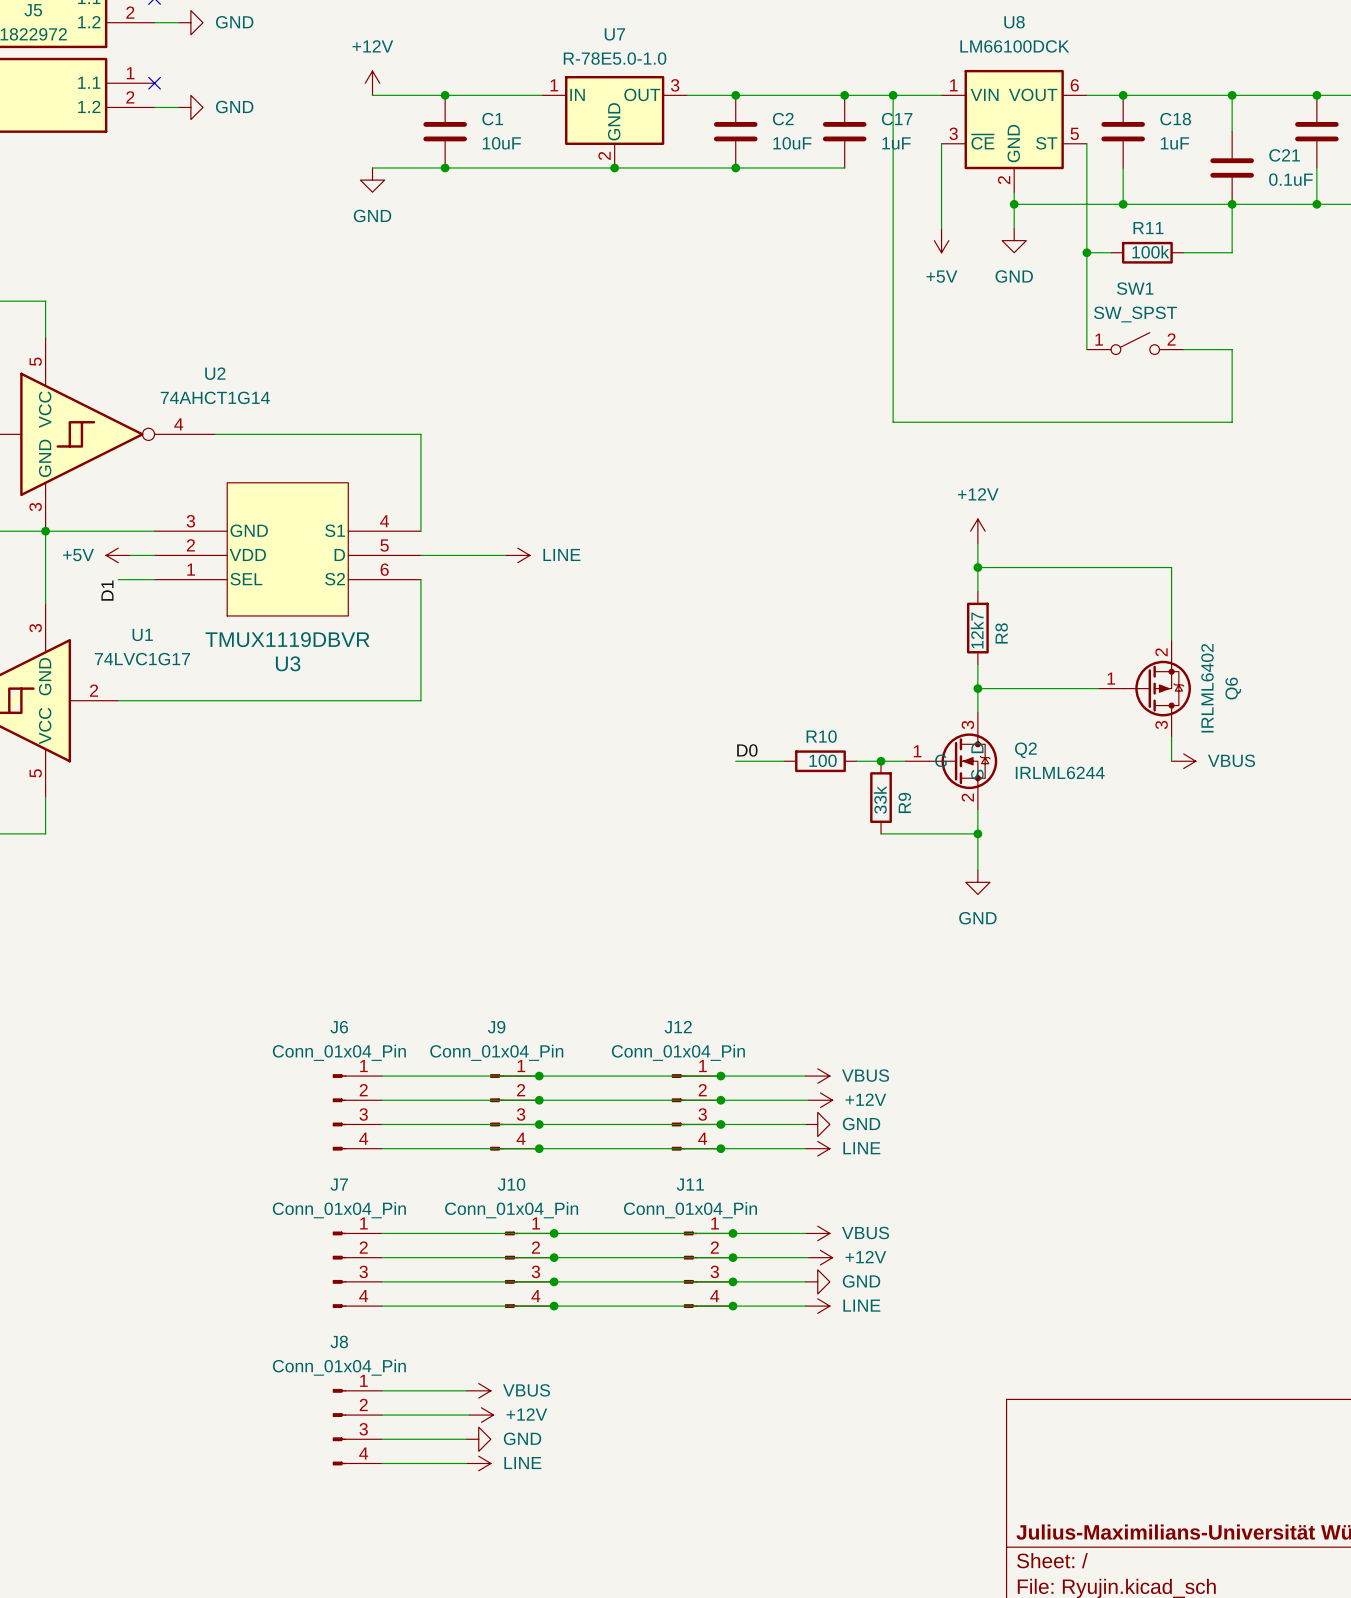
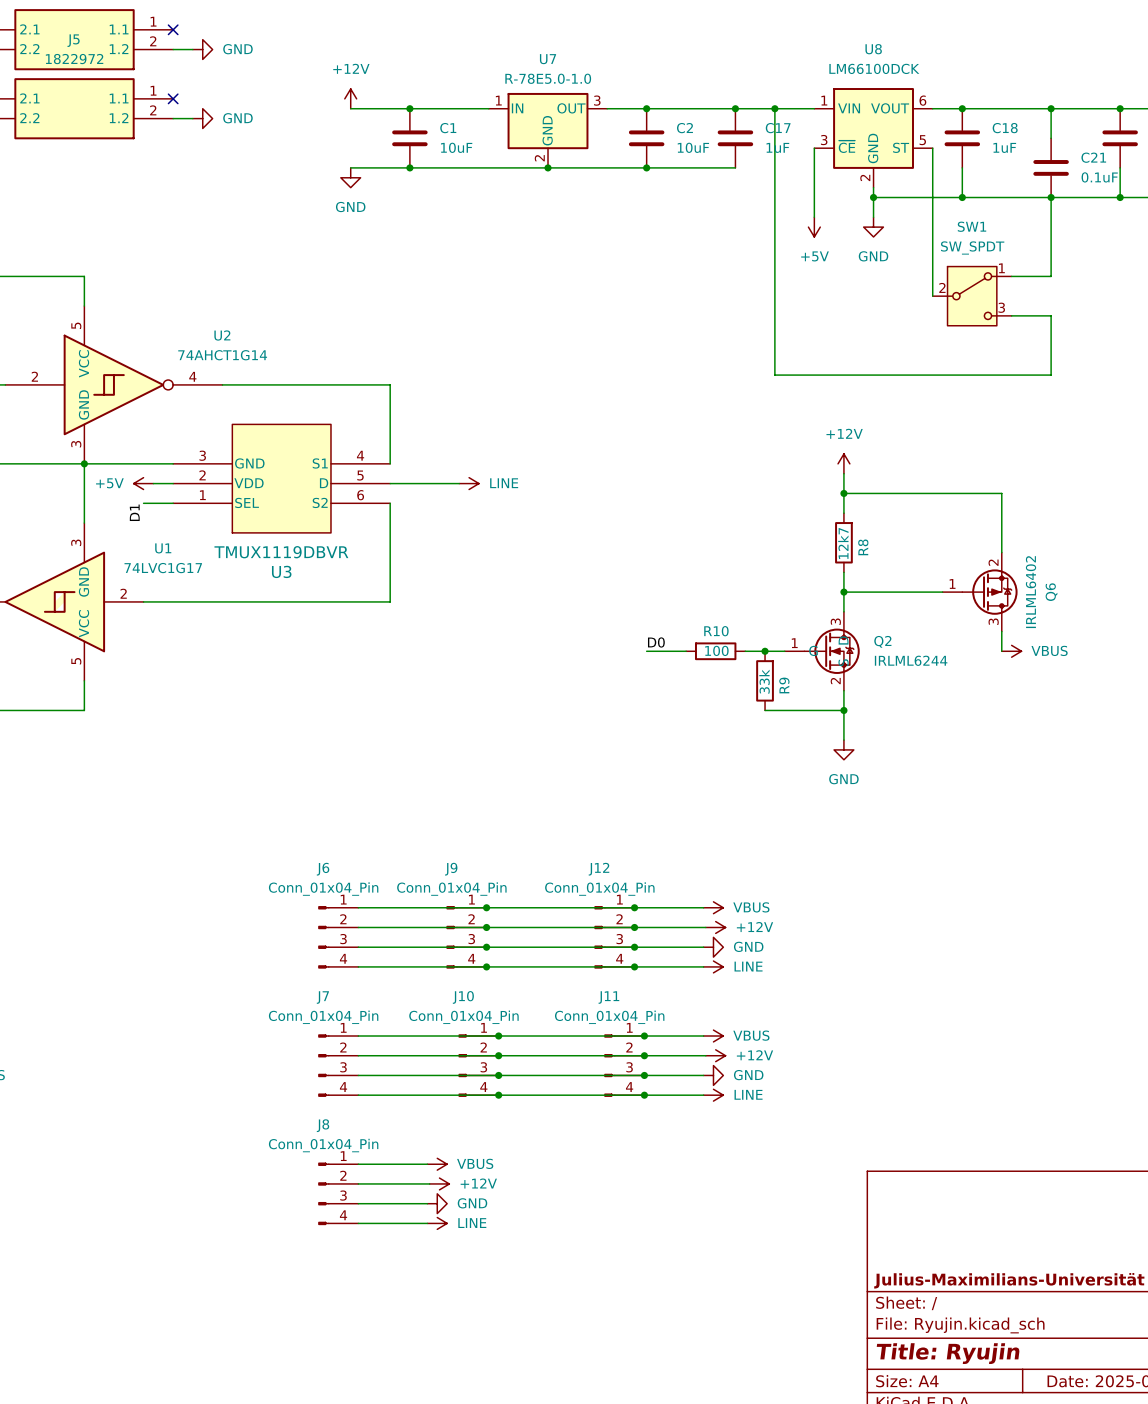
wire: (1086, 252) (1111, 252) -> none
junction: (1086, 252) -> none
R11: 100k (1147, 252) -> none
wire: (1183, 252) (1232, 252) -> (1011, 276) (1051, 276) (1051, 236)
SW1 name position: SW1 (1135, 288) -> SW1 (972, 226)
SW1 value: SW_SPST (1135, 314) -> SW_SPDT (972, 247)
wire: (1086, 325) (1086, 349) -> none
SW1 symbol: [1086, 332, 1184, 355] -> [932, 266, 1012, 326]

